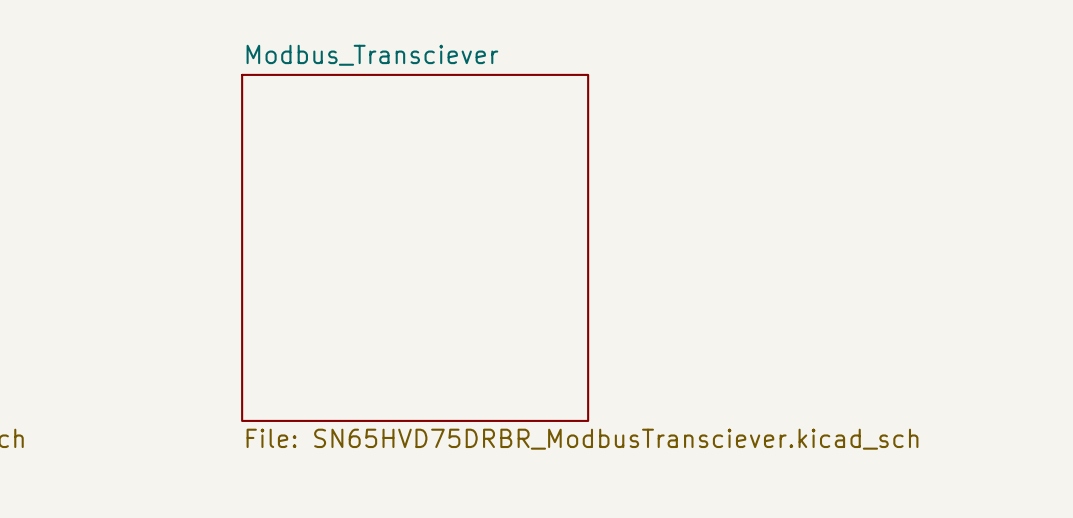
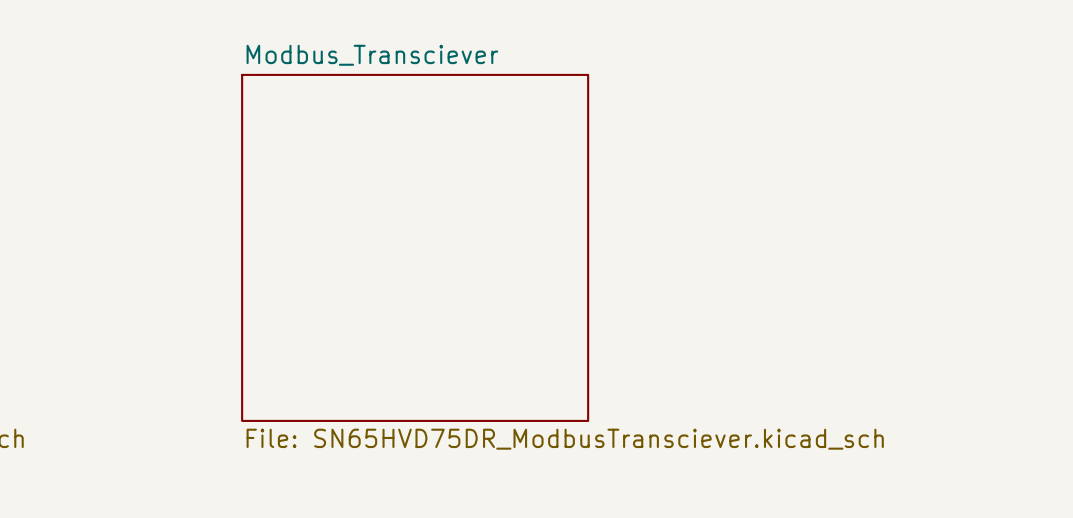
sheet Modbus_Transciever value: File: SN65HVD75DRBR_ModbusTransciever.kicad_sch (582, 439) -> File: SN65HVD75DR_ModbusTransciever.kicad_sch (565, 439)

